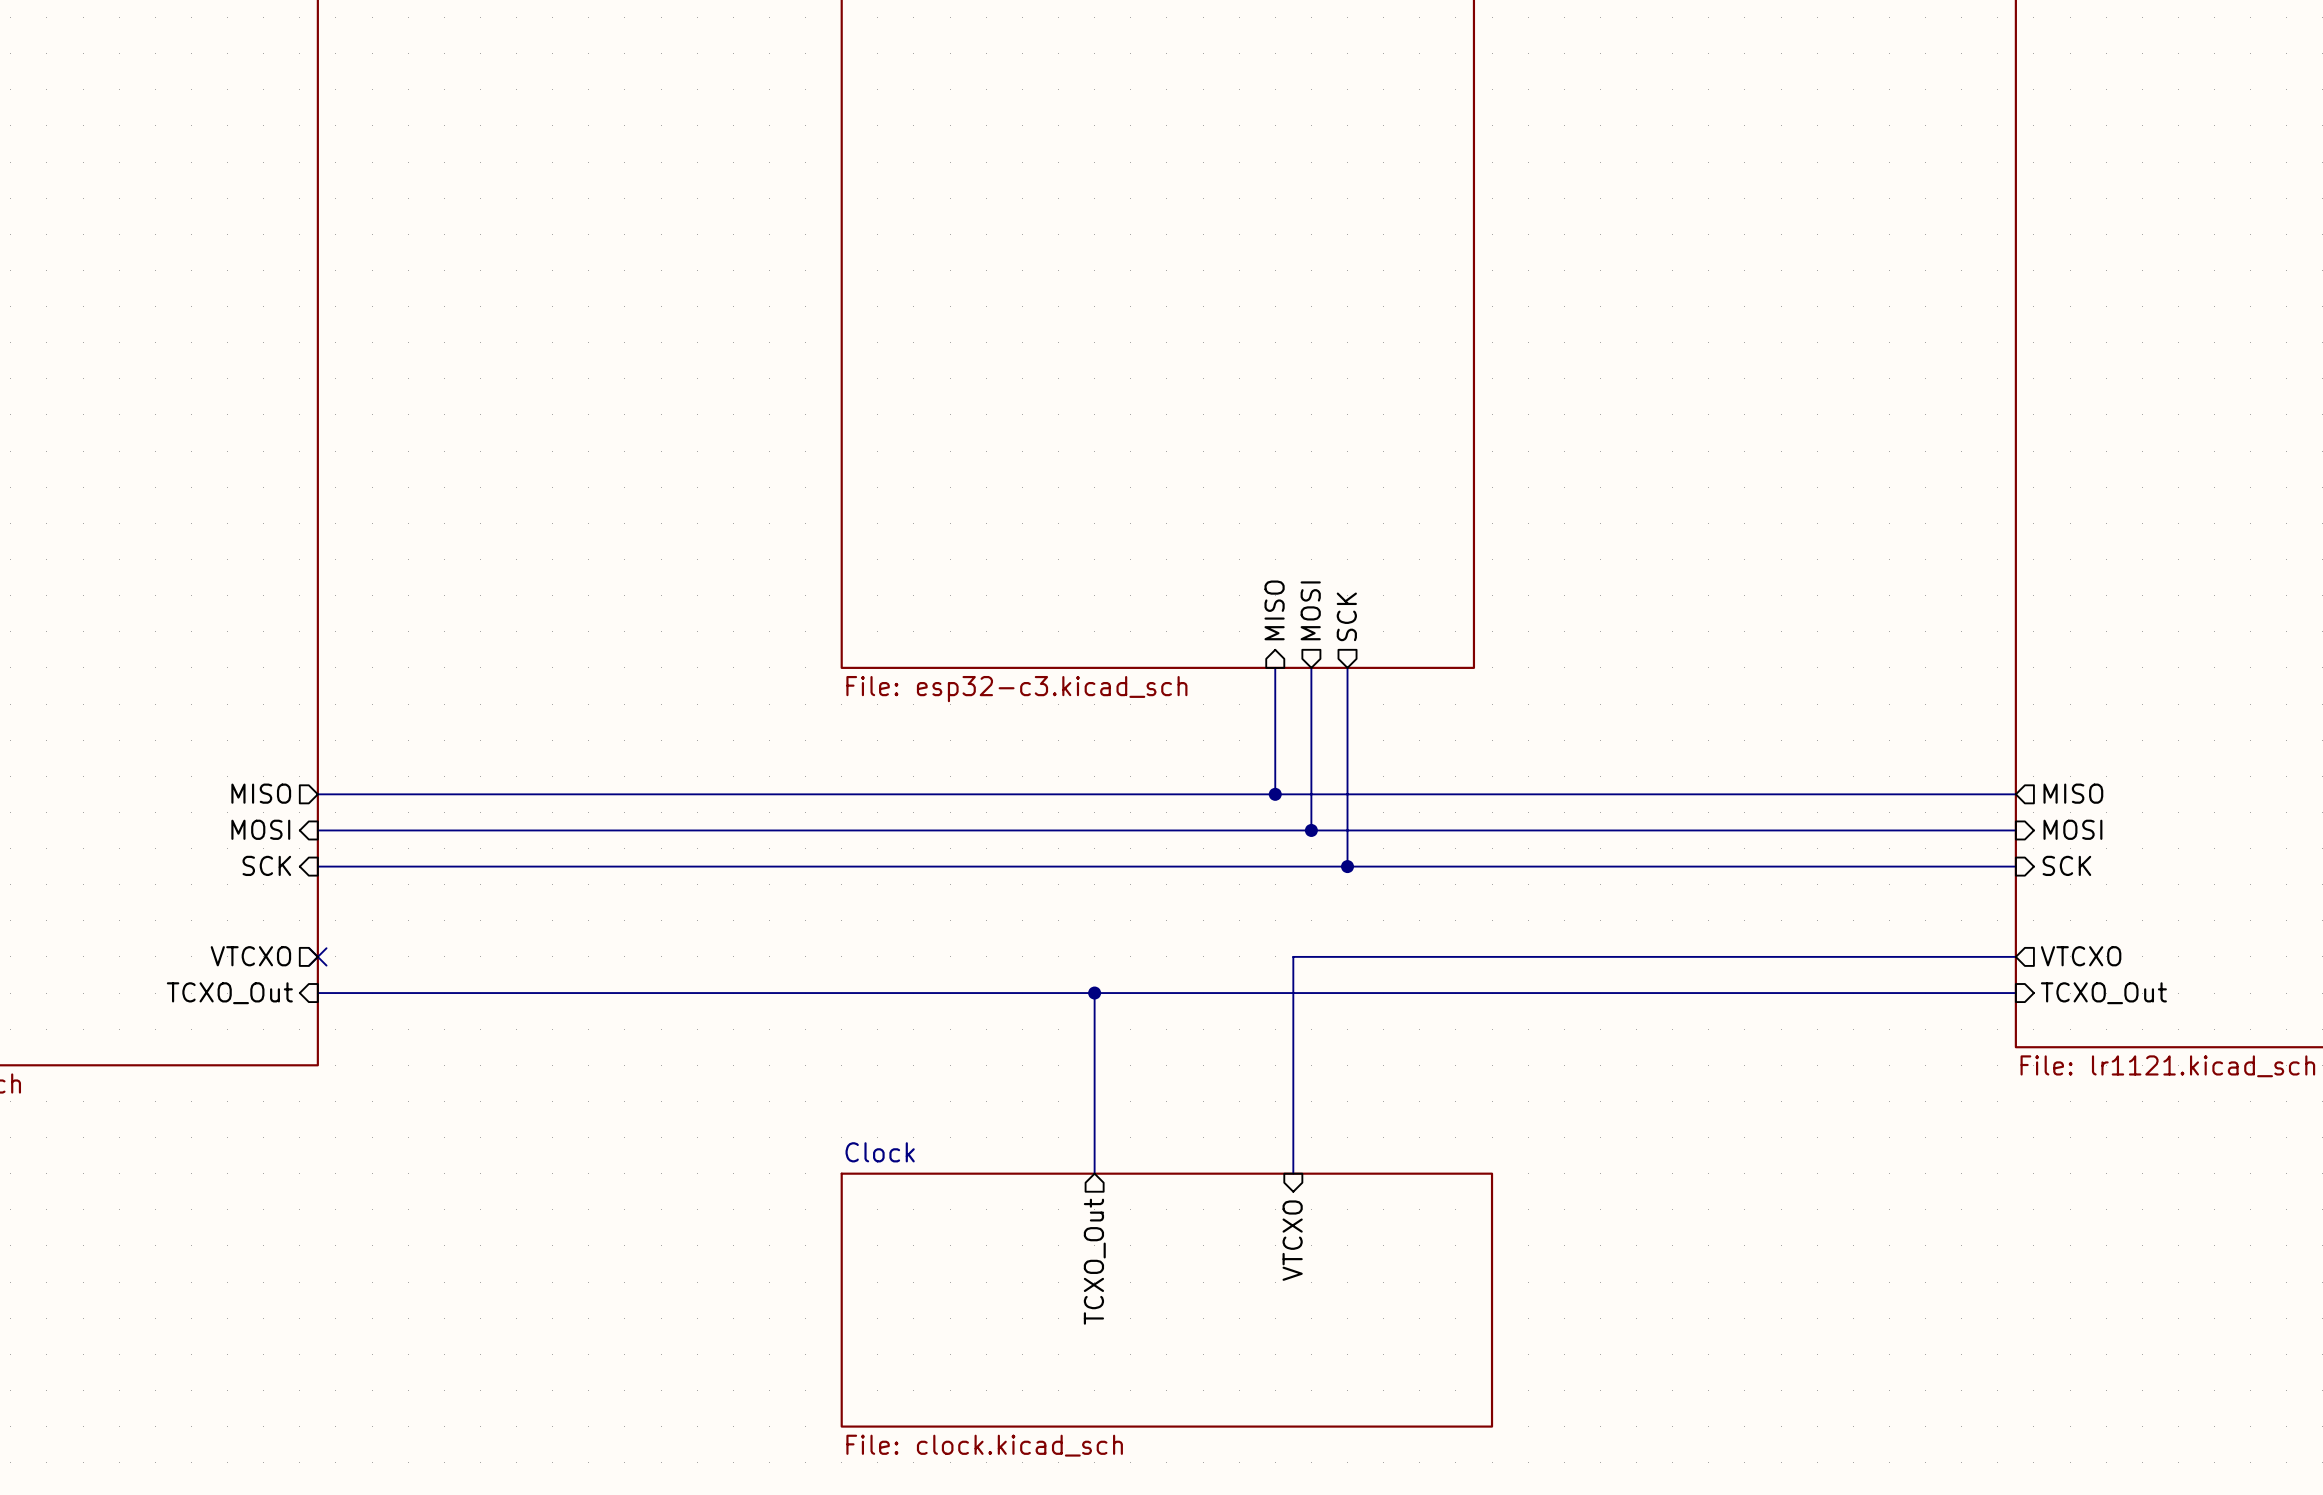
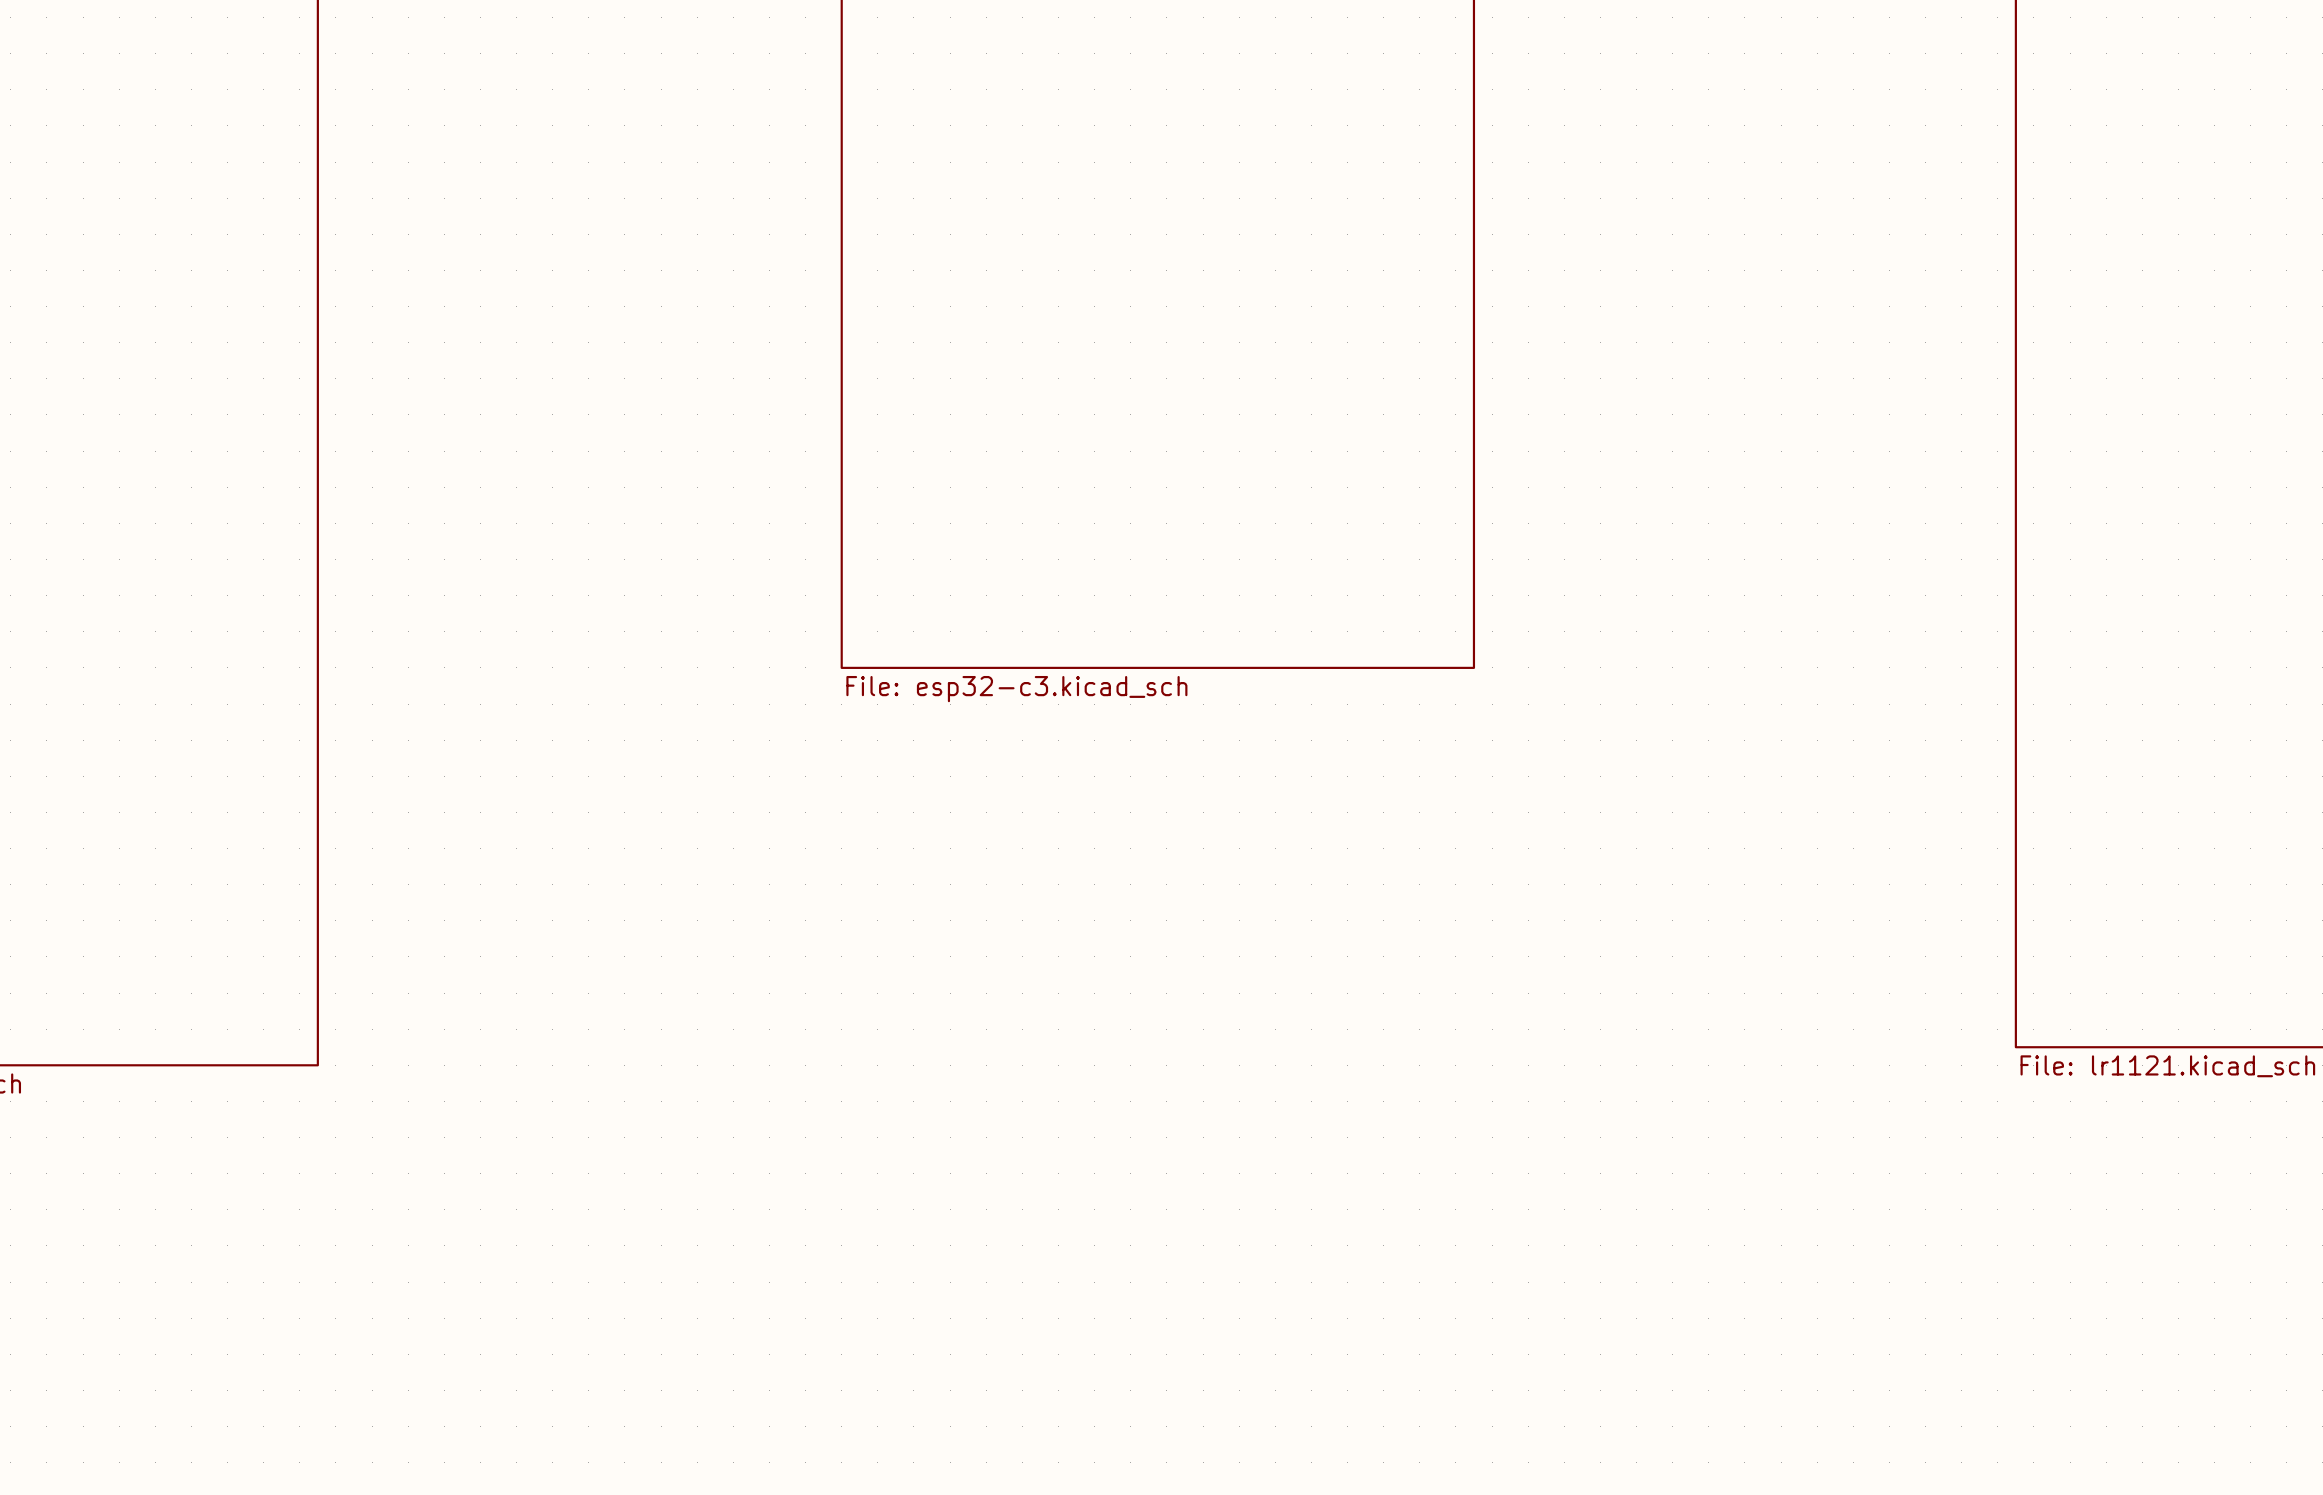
sheet pin: MISO (1274, 610) -> none
sheet pin: MOSI (1310, 610) -> none
sheet pin: SCK (1346, 616) -> none
wire: (1275, 667) (1275, 794) -> none
wire: (1311, 667) (1311, 830) -> none
wire: (1347, 667) (1347, 866) -> none
sheet pin: MISO (261, 793) -> none
sheet pin: MISO (2073, 793) -> none
wire: (317, 794) (2015, 794) -> none
junction: (1275, 794) -> none
sheet pin: MOSI (260, 829) -> none
sheet pin: MOSI (2072, 829) -> none
wire: (317, 830) (2015, 830) -> none
junction: (1311, 830) -> none
sheet pin: SCK (266, 865) -> none
sheet pin: SCK (2066, 865) -> none
wire: (317, 866) (2015, 866) -> none
junction: (1347, 866) -> none
sheet pin: VTCXO (250, 956) -> none
no-connect mark: (317, 956) -> none
wire: (2015, 956) (1293, 956) (1293, 1173) -> none
sheet pin: VTCXO (2081, 956) -> none
sheet pin: TCXO_Out (229, 993) -> none
wire: (317, 993) (2015, 993) -> none
wire: (1094, 993) (1094, 1173) -> none
junction: (1094, 993) -> none
sheet pin: TCXO_Out (2103, 993) -> none
sheet pin: VTCXO (1292, 1240) -> none
sheet pin: TCXO_Out (1094, 1261) -> none
sheet Clock: File: clock.kicad_sch (1166, 1300) -> none

